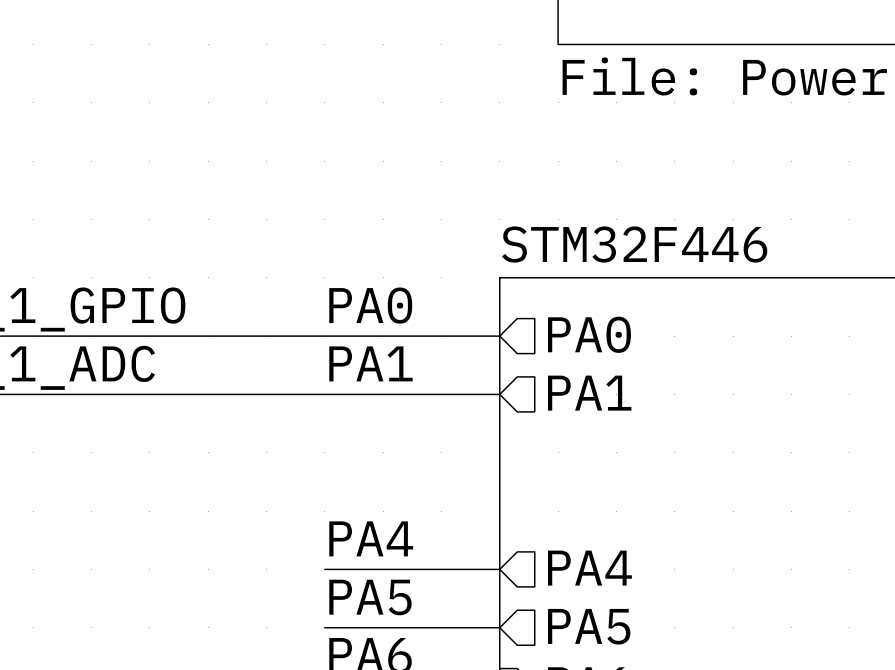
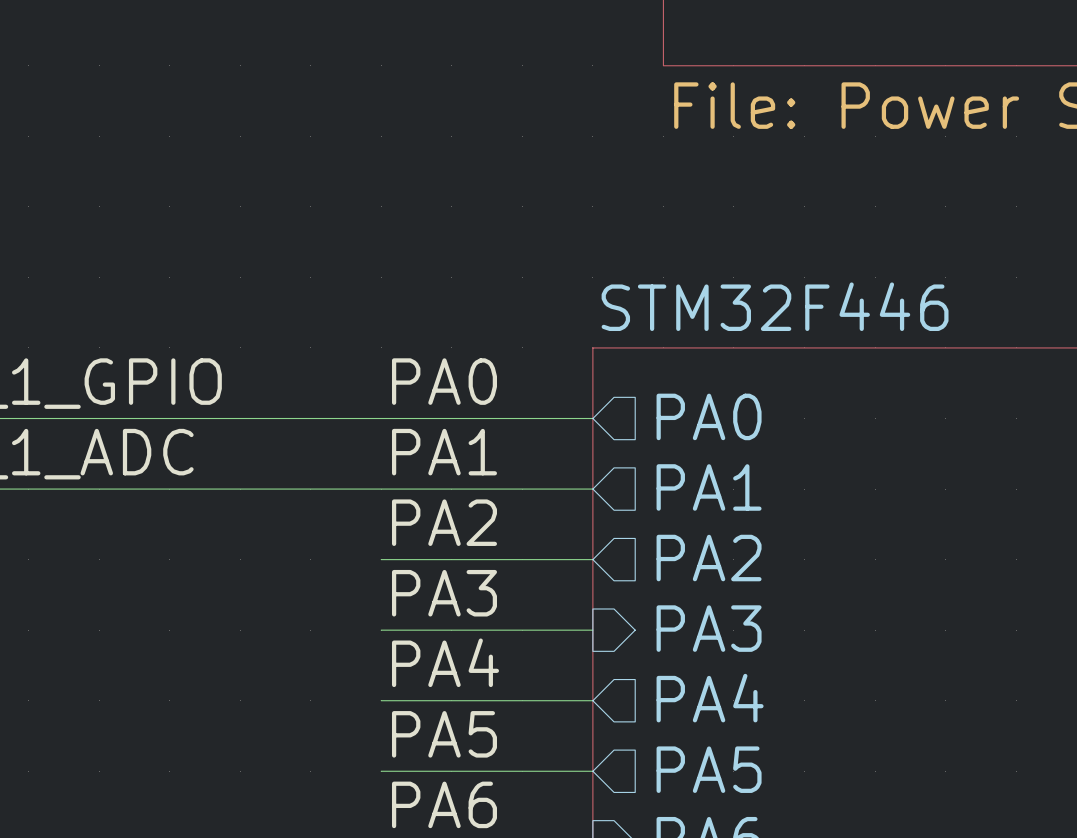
label: none -> PA2 (444, 522)
sheet pin: none -> PA2 (709, 558)
wire: none -> (381, 559) (592, 559)
label: none -> PA3 (444, 593)
sheet pin: none -> PA3 (709, 628)
wire: none -> (381, 630) (592, 630)

